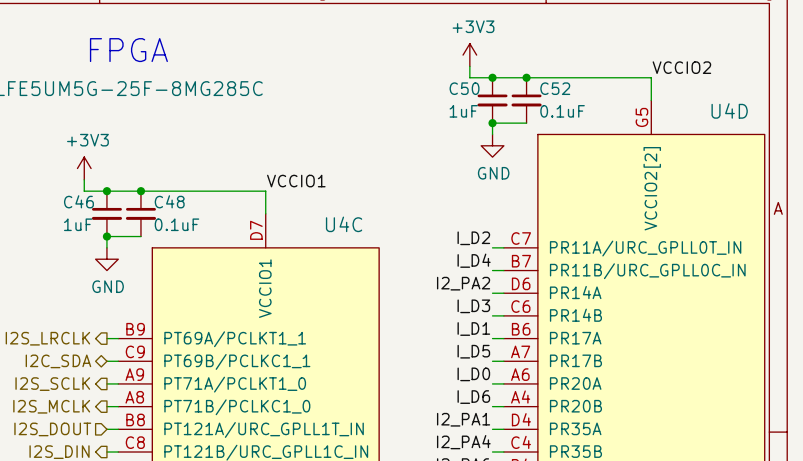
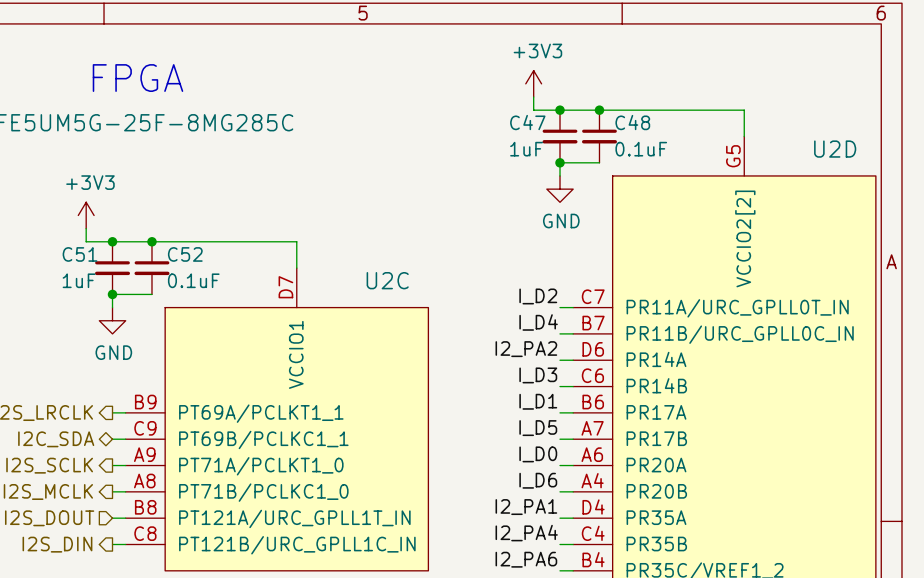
label: VCCIO2 (681, 67) -> none
C50 name: C50 (464, 88) -> C47 (527, 122)
C52 name: C52 (555, 88) -> C48 (632, 122)
U4D name: U4D (729, 110) -> U2D (835, 149)
label: VCCIO1 (296, 181) -> none
C46 name: C46 (78, 201) -> C51 (80, 254)
C48 name: C48 (169, 201) -> C52 (185, 254)
U4C name: U4C (344, 224) -> U2C (387, 280)

